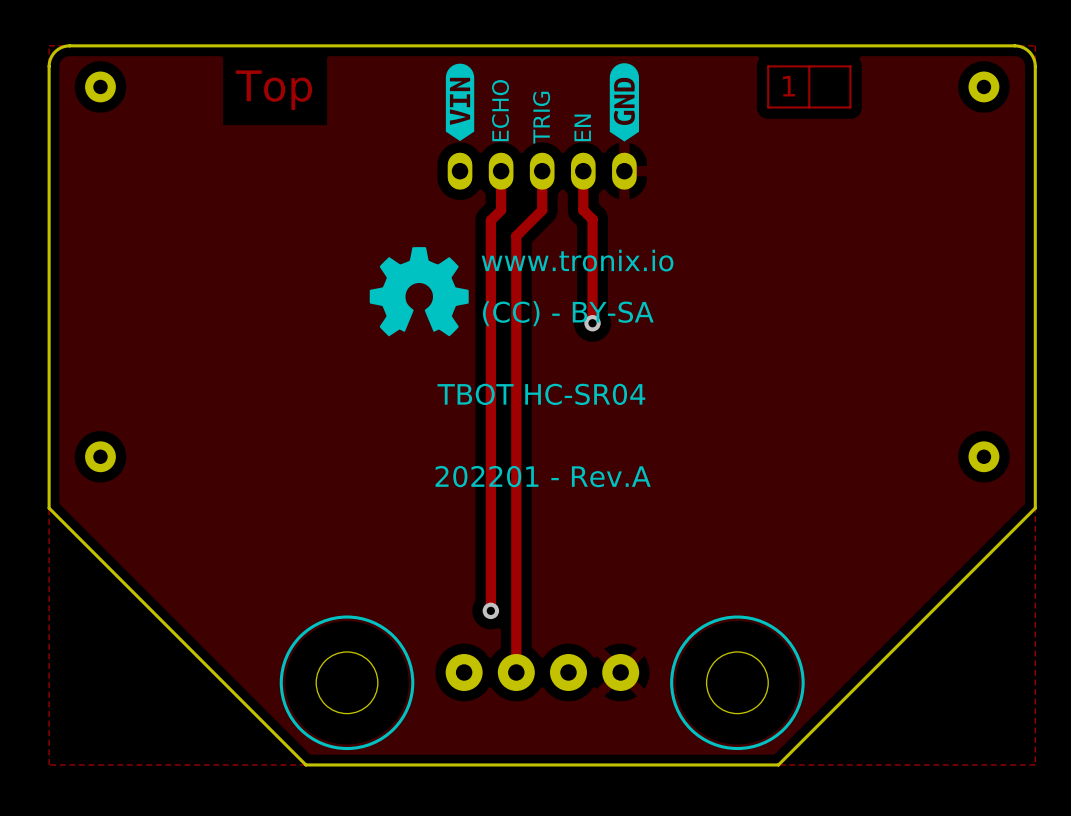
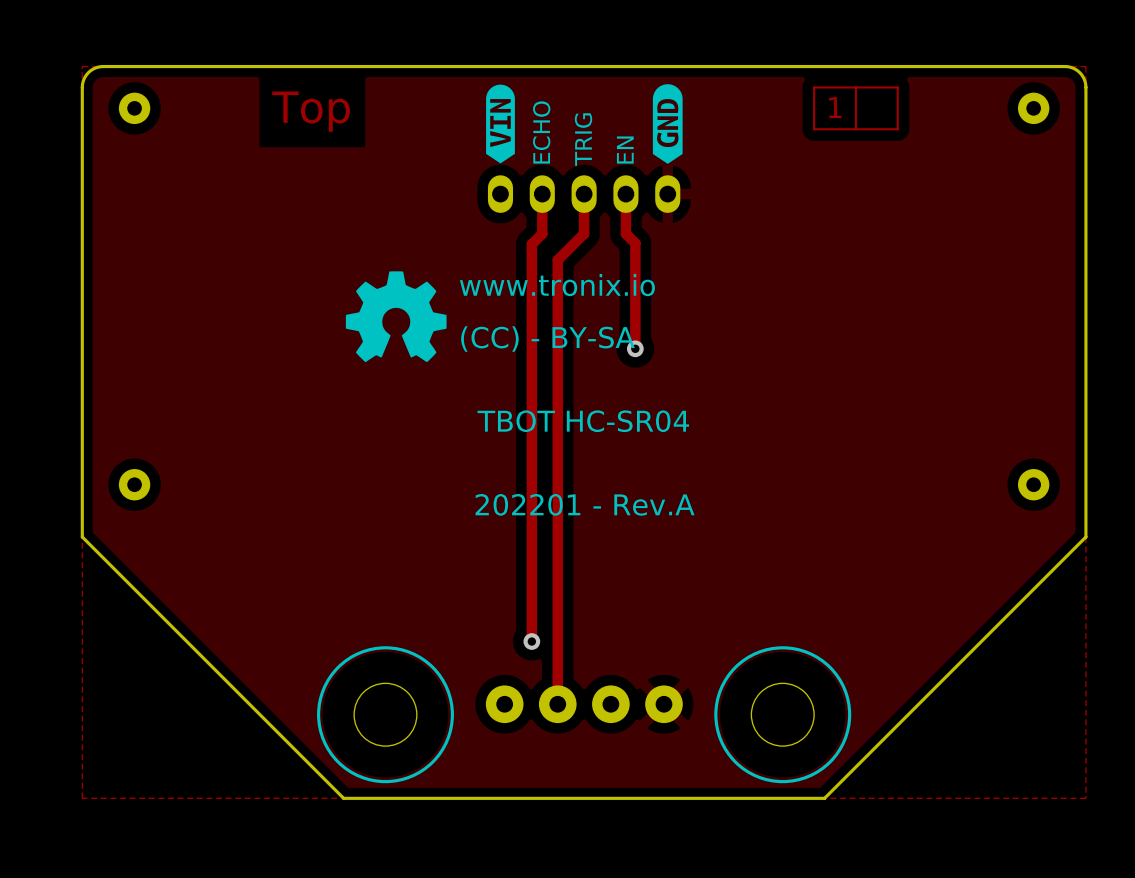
text position: www.tronix.io (577, 260) -> www.tronix.io (557, 285)
drawing position: (419, 291) -> (396, 316)
text position: (CC) - BY-SA (568, 313) -> (CC) - BY-SA (547, 339)

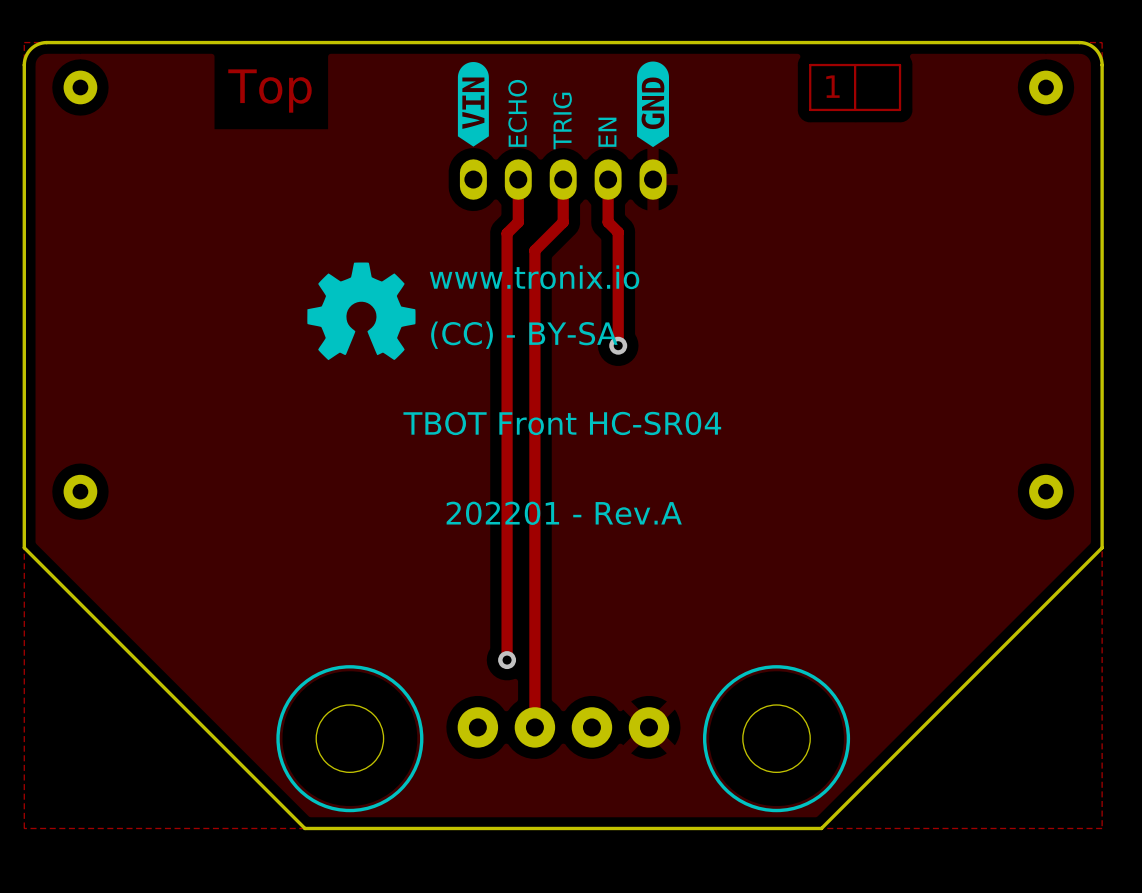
text: TBOT HC-SR04 (583, 421) -> TBOT Front HC-SR04 (562, 423)

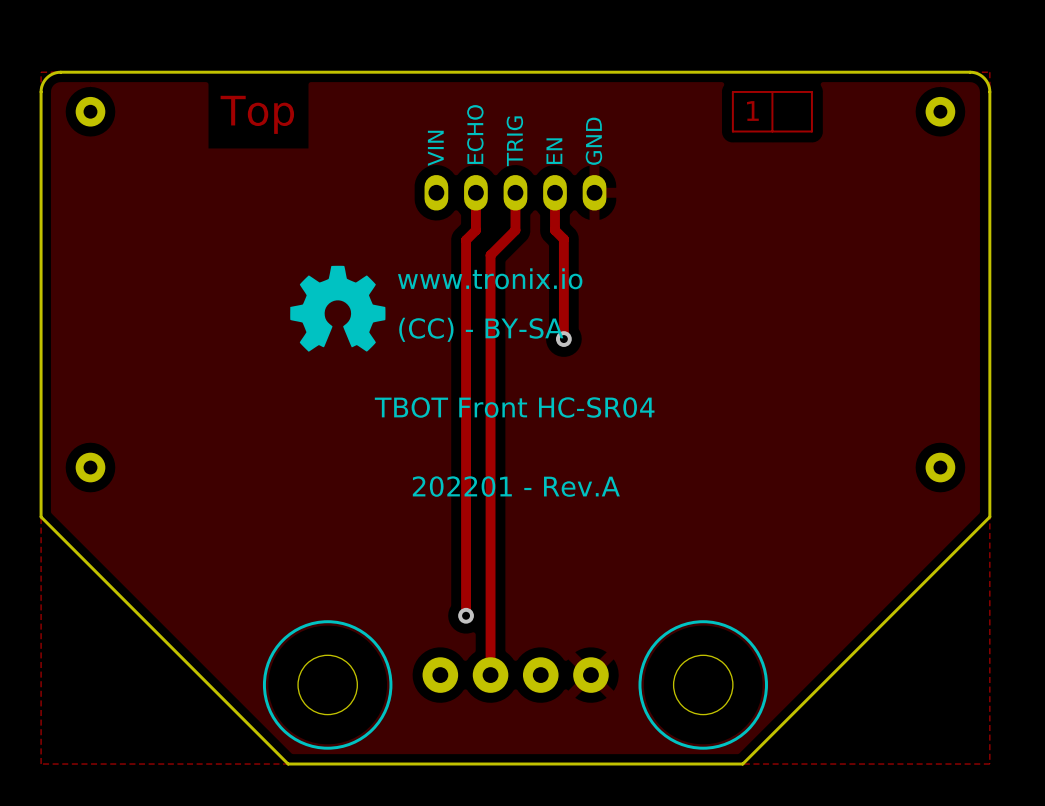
drawing: [637, 61, 670, 148] -> none
drawing: [457, 62, 489, 147] -> none
text: none -> GND (593, 141)
text: none -> VIN (435, 148)

